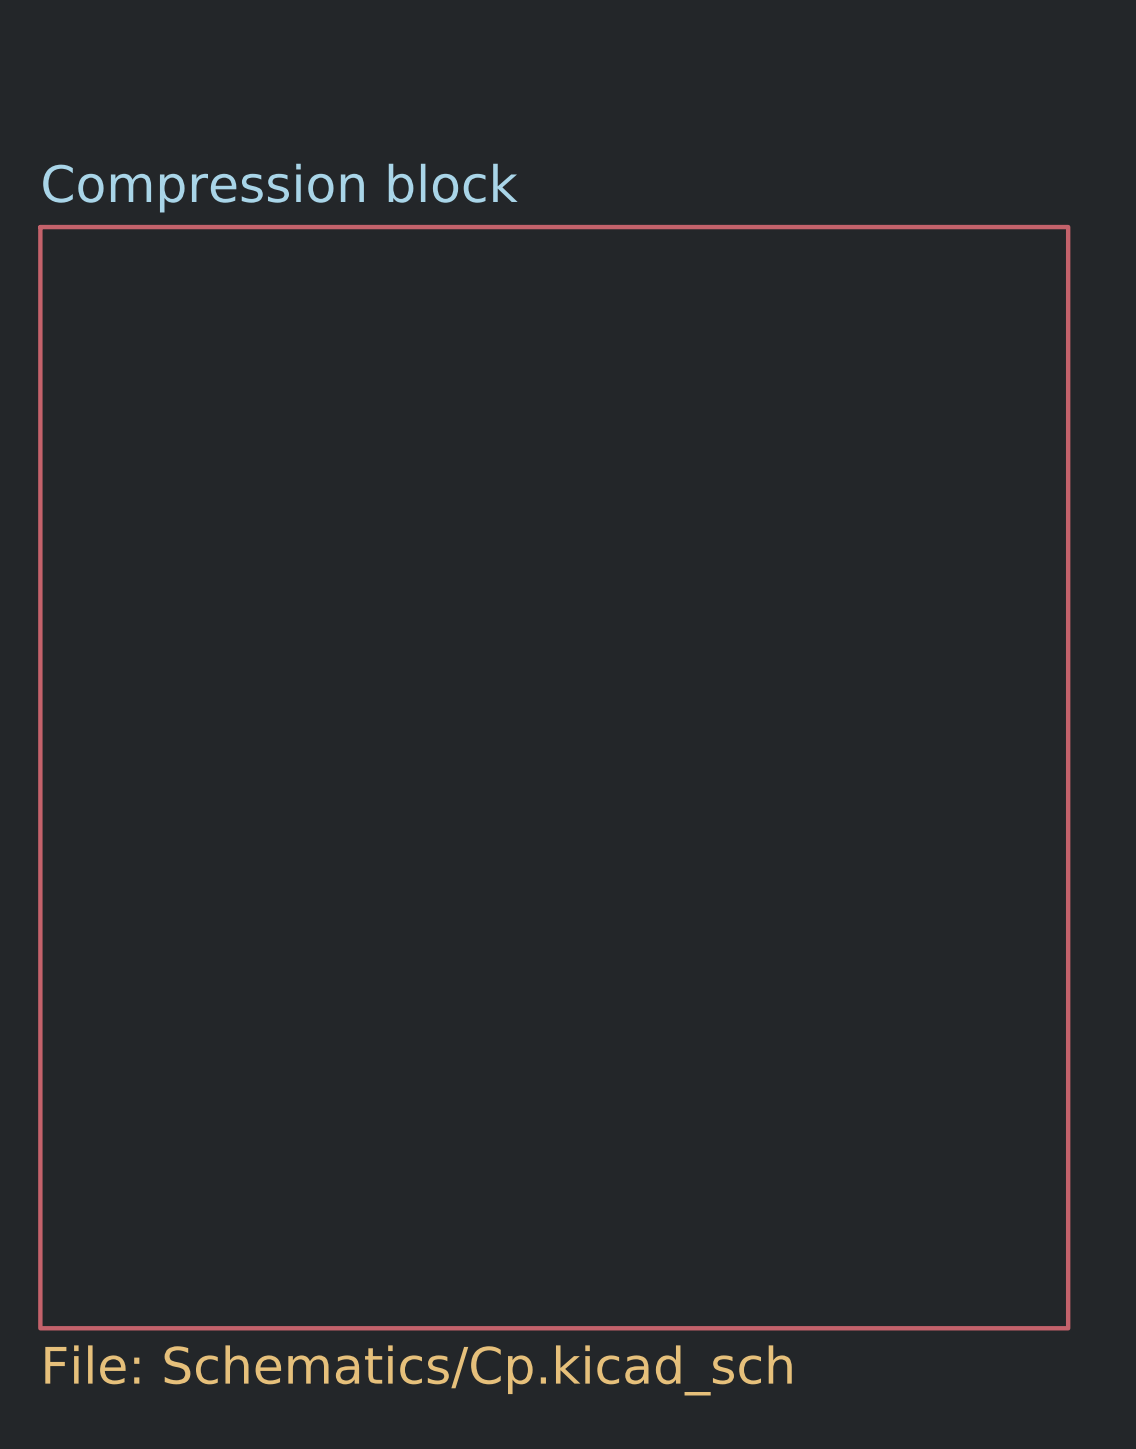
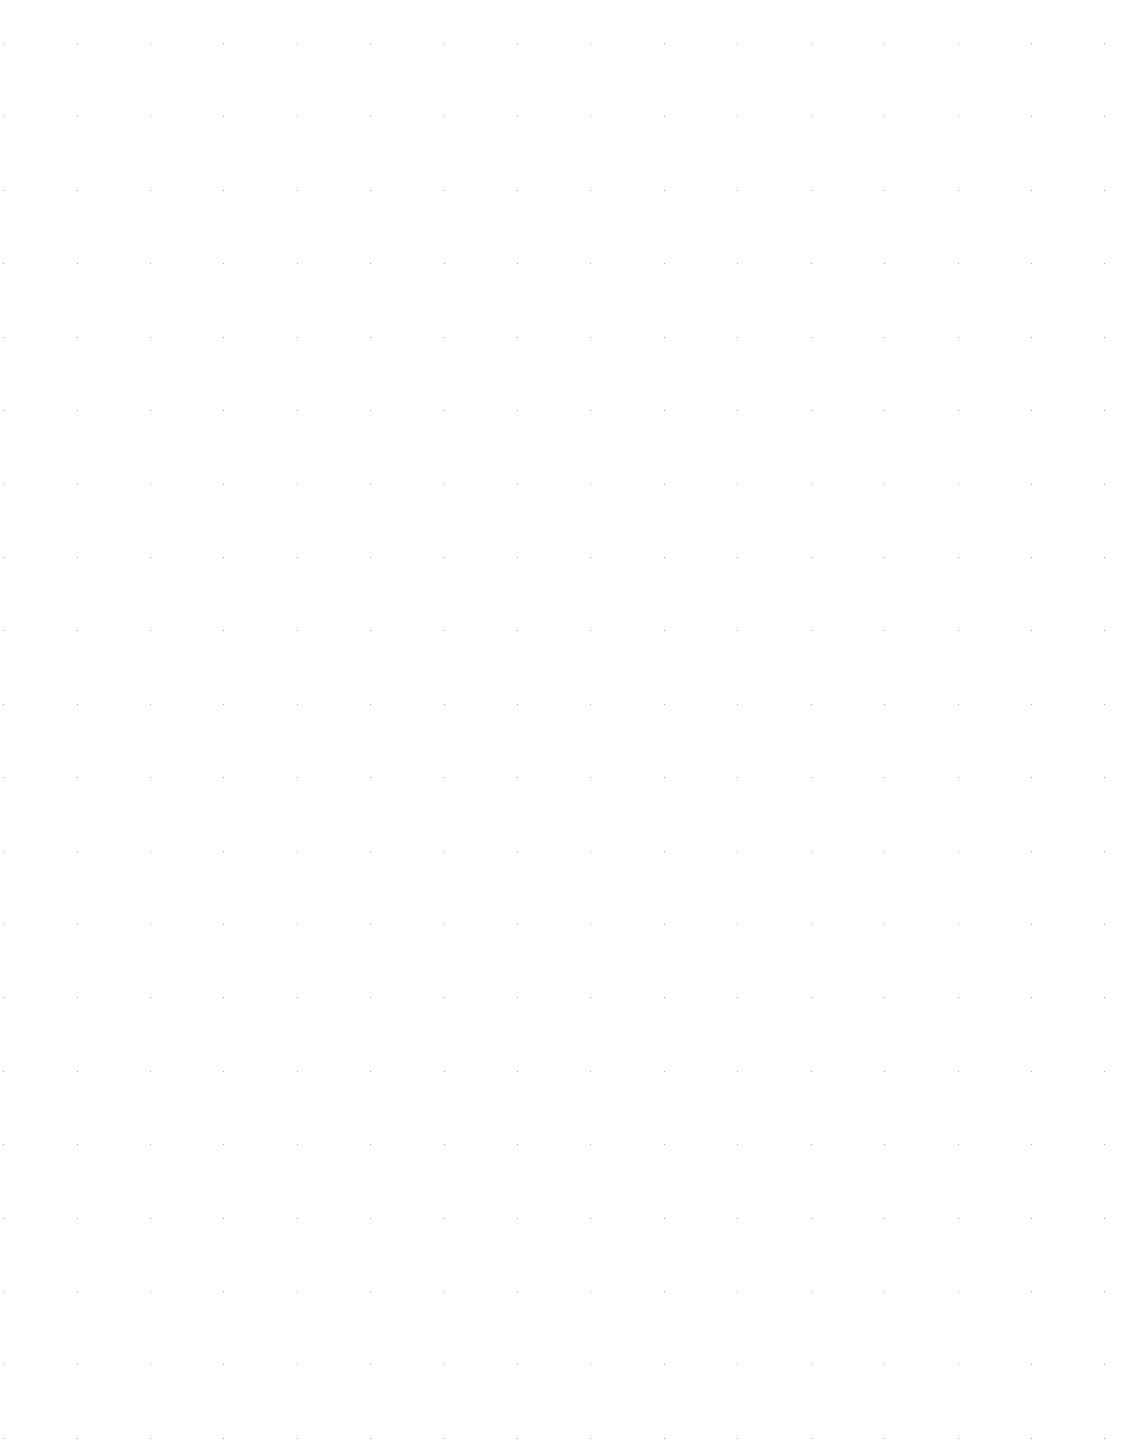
sheet Compression block: File: Schematics/Cp.kicad_sch (554, 777) -> none

